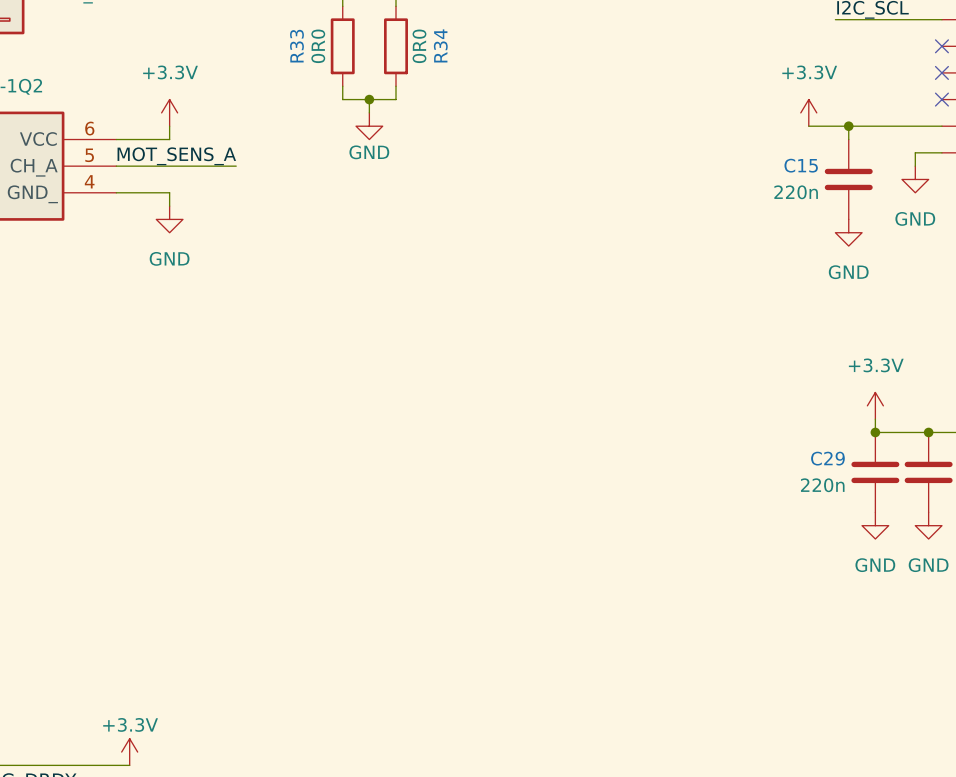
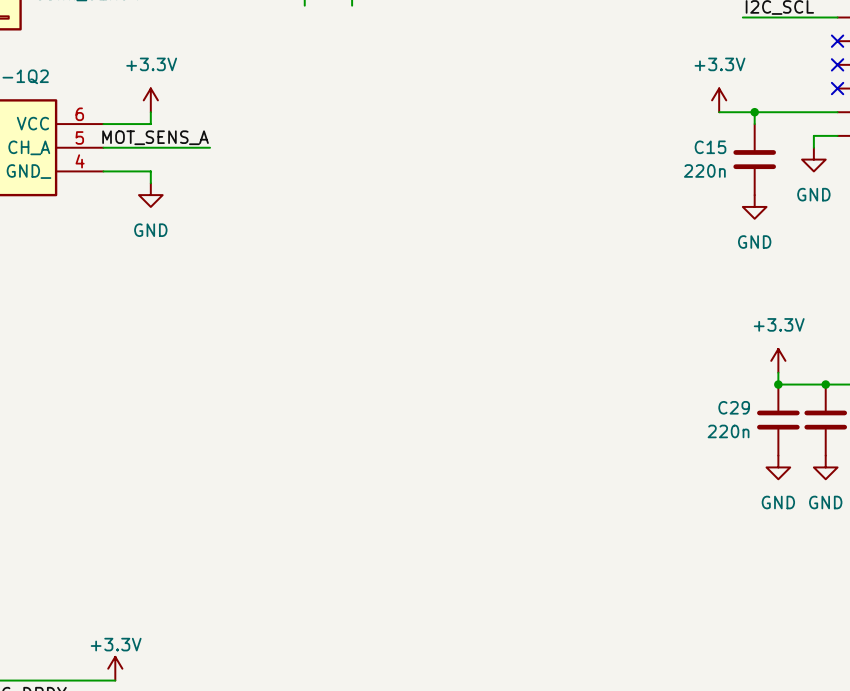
R33: 0R0 (342, 46) -> none
R34: 0R0 (395, 46) -> none
wire: (342, 86) (342, 99) (395, 99) (395, 86) -> none
wire: (369, 99) (369, 112) -> none
junction: (369, 99) -> none
power symbol: GND (369, 126) -> none

